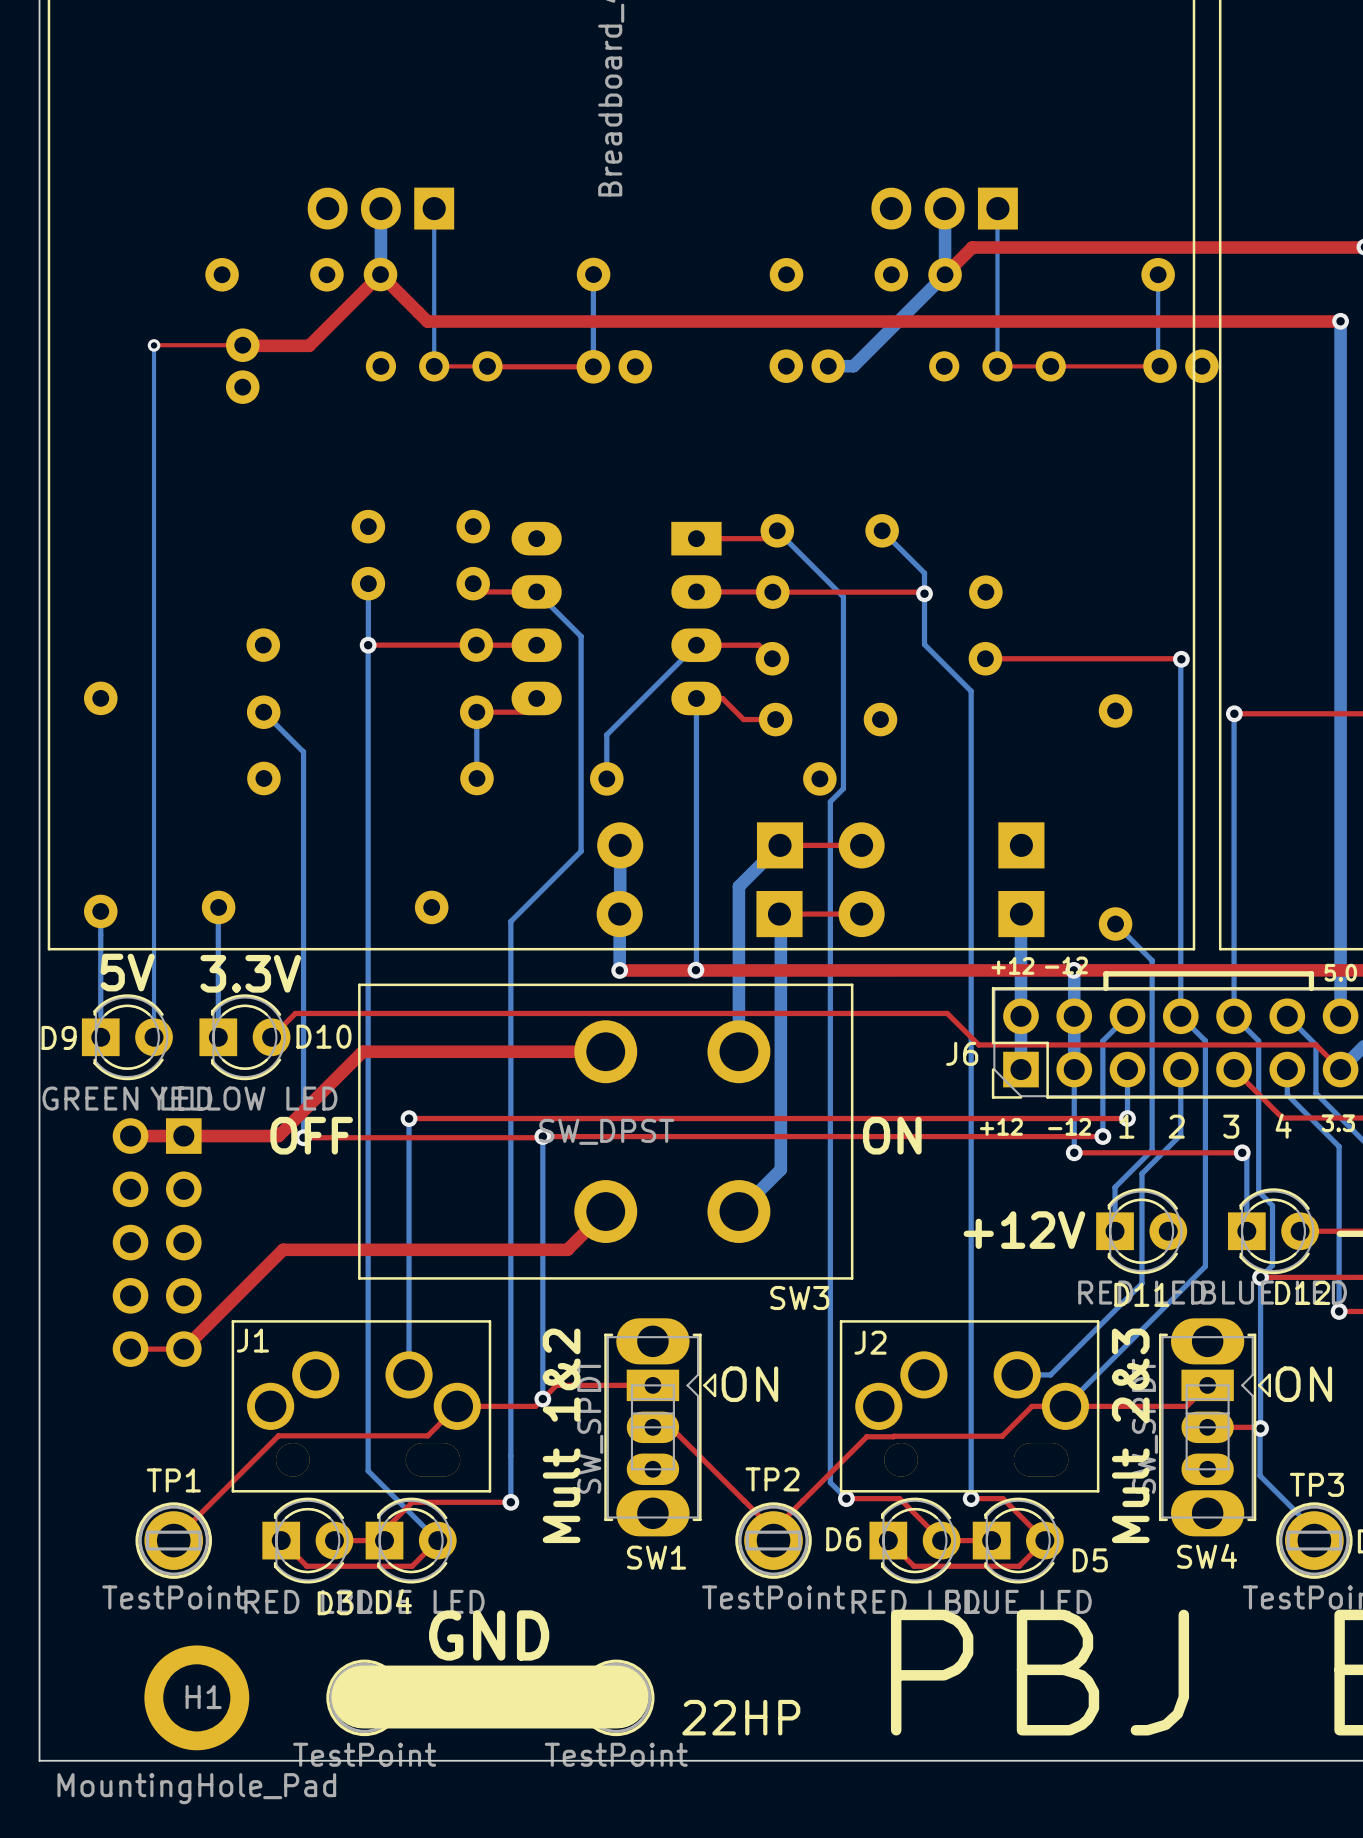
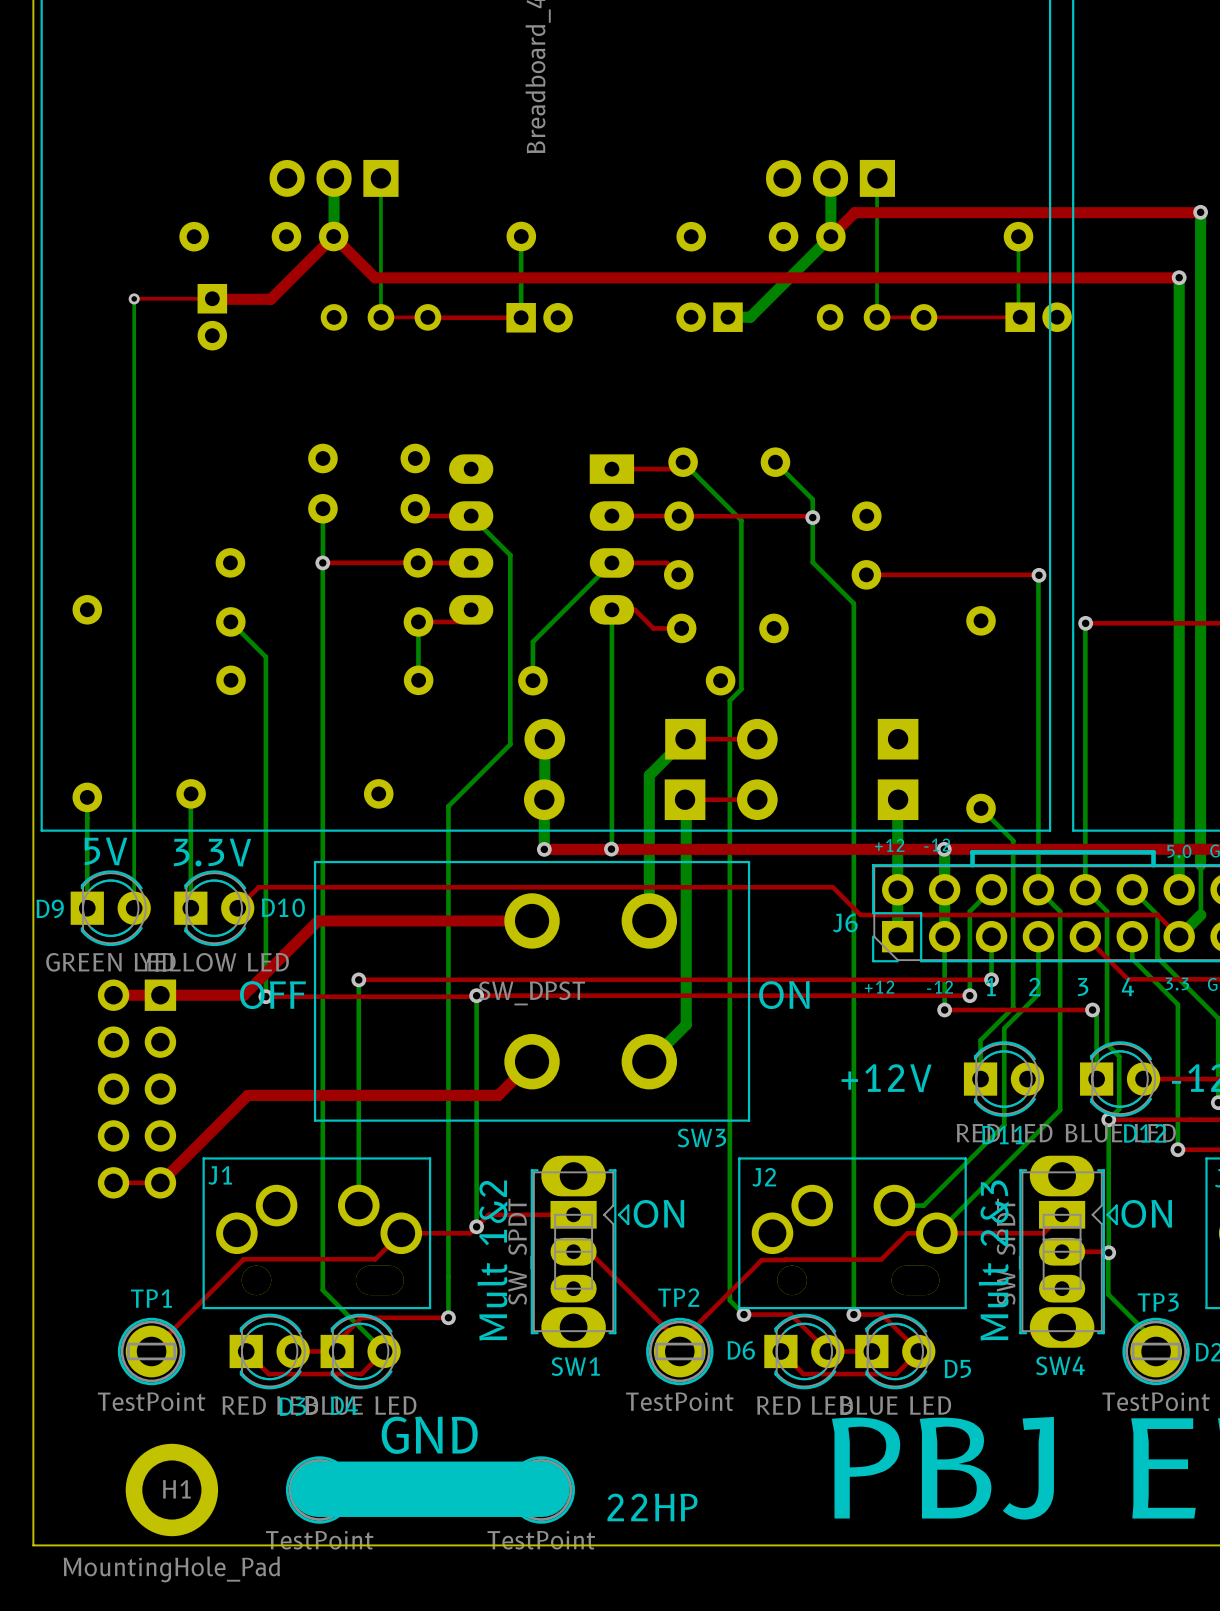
part footprint: [225, 328, 260, 404] -> [197, 283, 228, 351]
part footprint: [769, 349, 846, 383] -> [676, 302, 743, 332]
part footprint: [1143, 349, 1219, 383] -> [1005, 302, 1072, 332]
part footprint: [576, 350, 653, 384] -> [506, 302, 573, 333]

